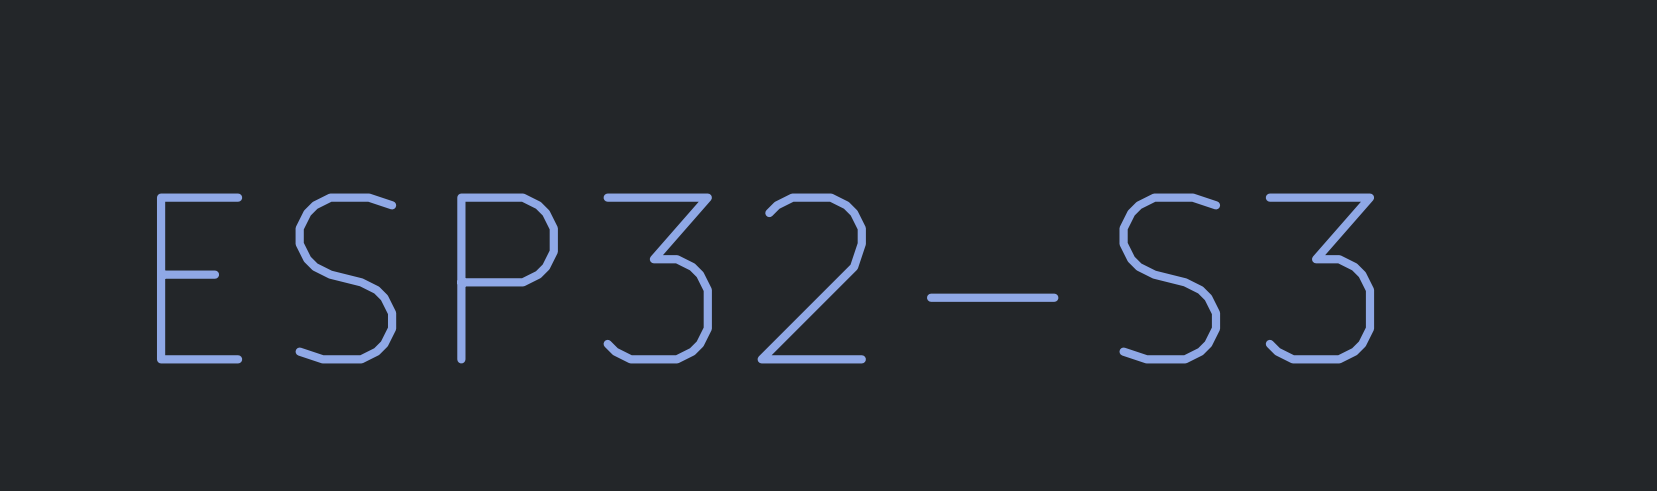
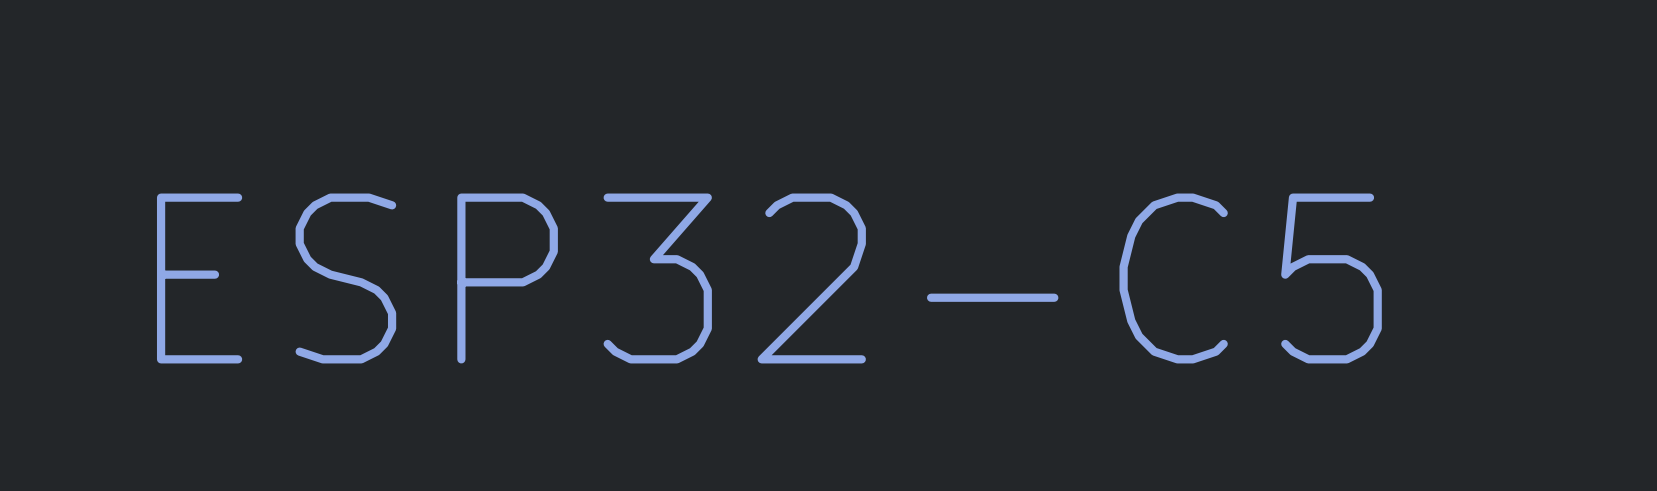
text: ESP32-S3 (765, 278) -> ESP32-C5 (769, 278)

